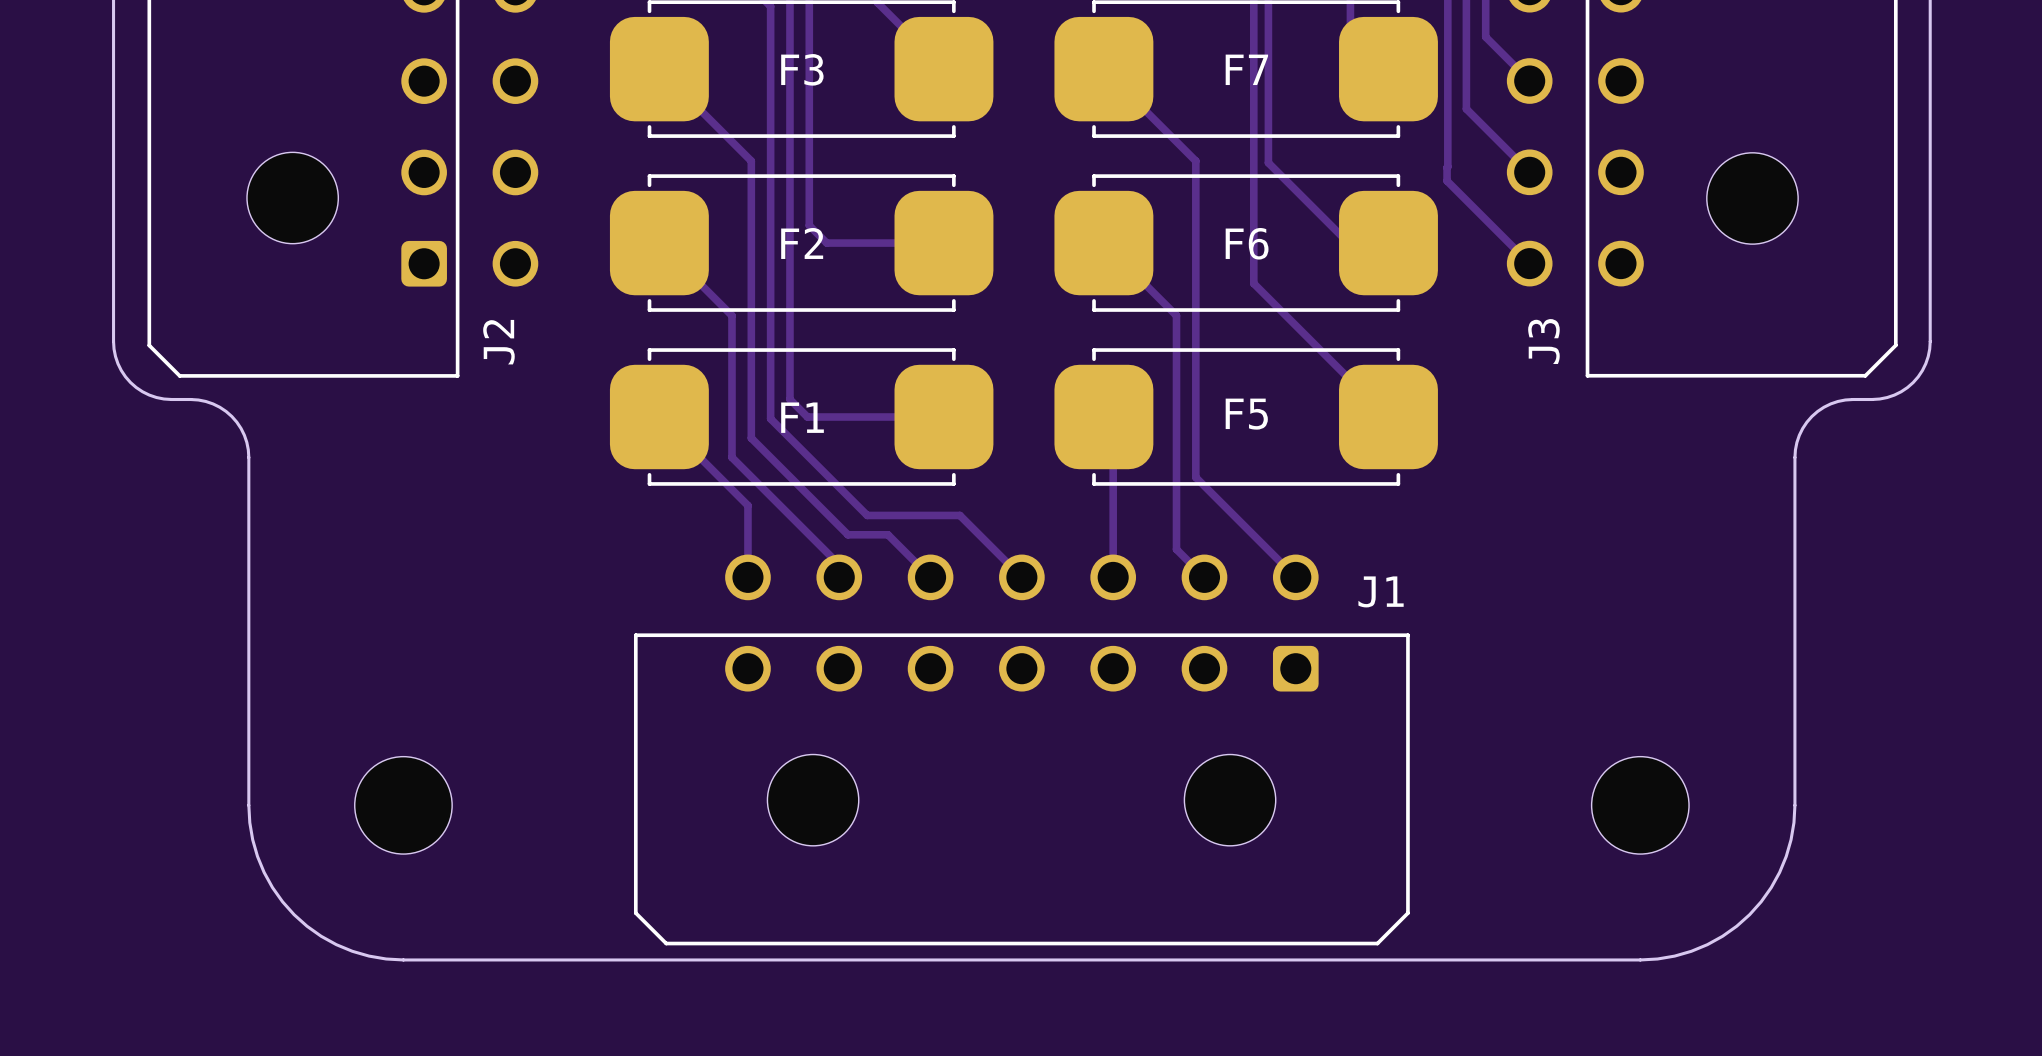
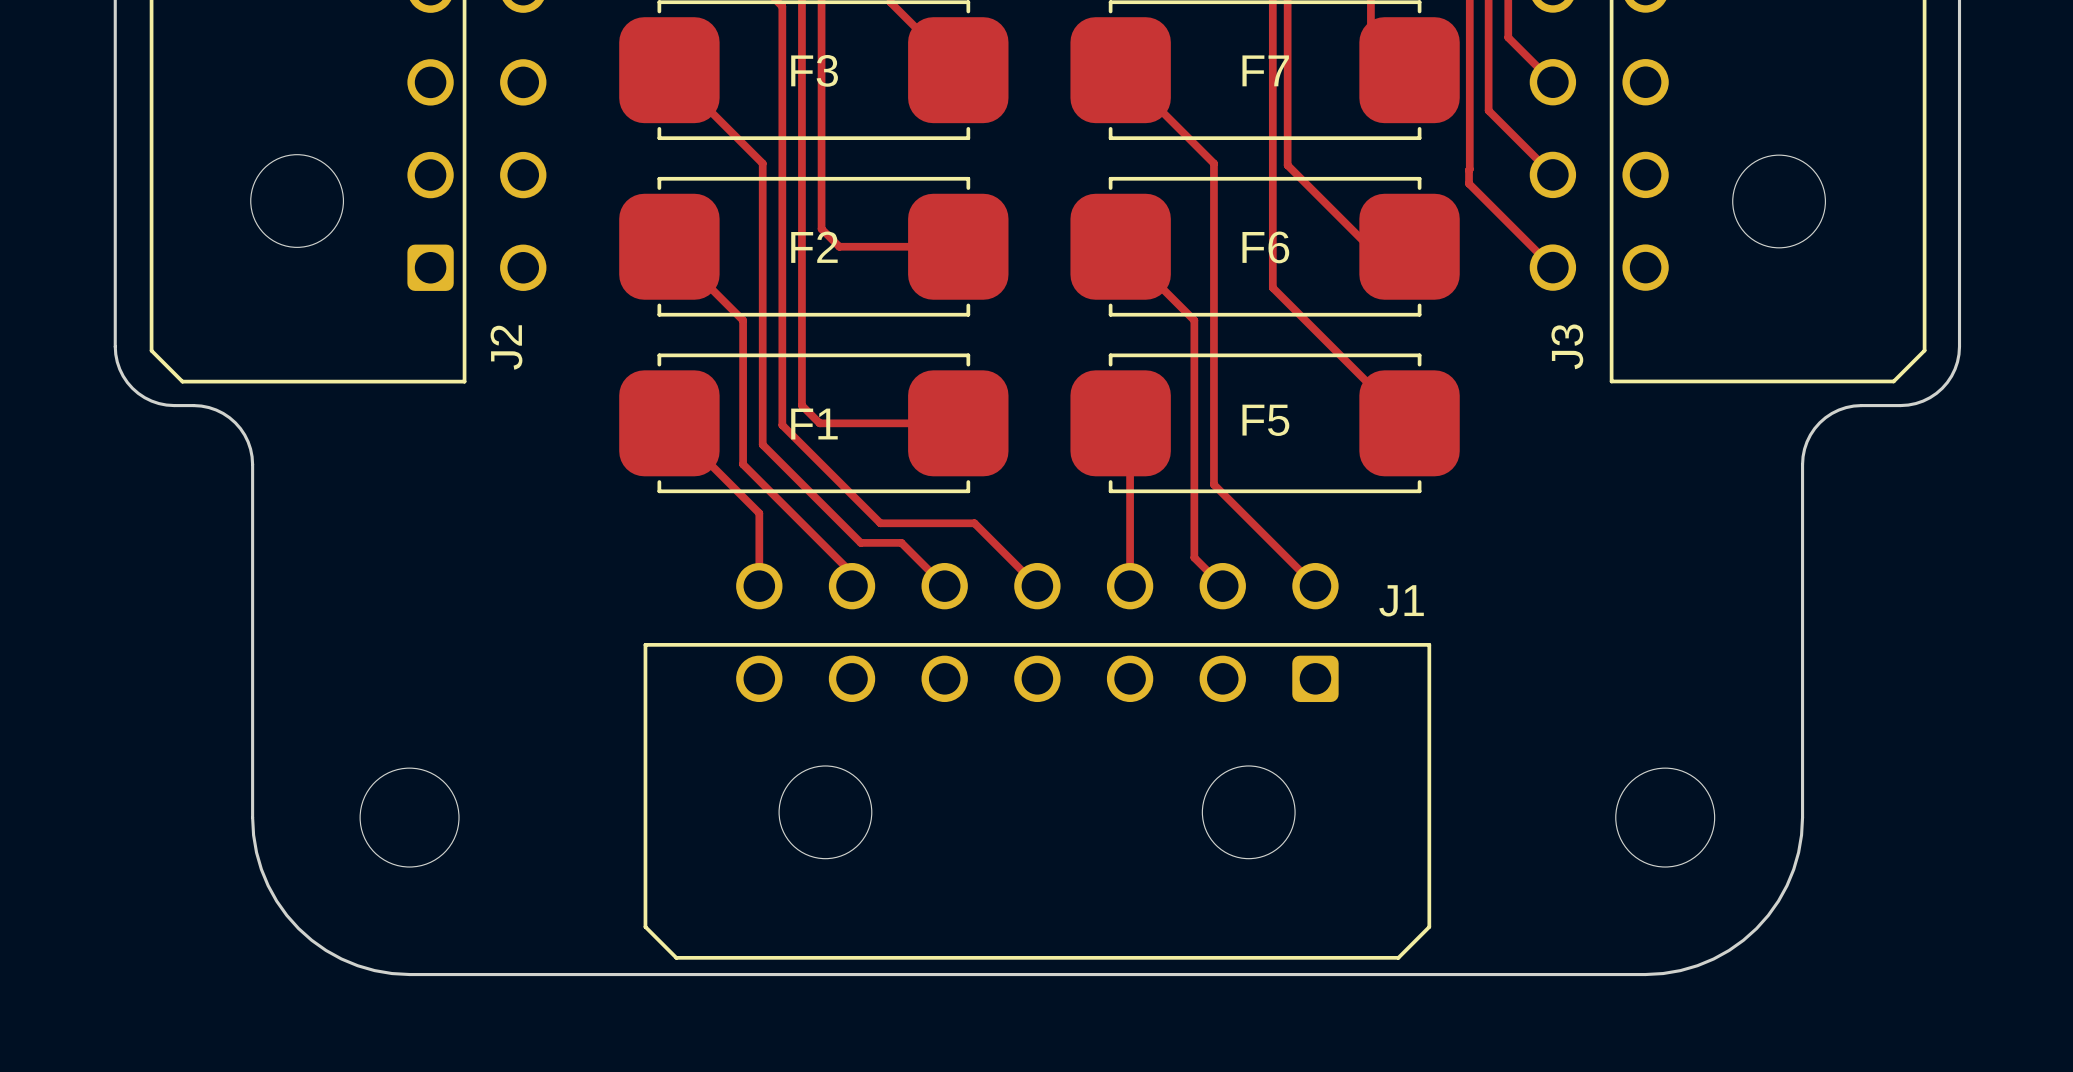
board edge: (1852, 399) (1830, 403) (1811, 416) (1802, 428) (1795, 449) (1794, 805) (1793, 822) (1786, 856) (1771, 887) (1761, 901) (1736, 926) (1722, 936) (1691, 951) (1674, 956) (1657, 958) (1621, 959) -> (1881, 405) (1853, 406) (1831, 413) (1819, 422) (1810, 434) (1803, 456) (1802, 817) (1798, 852) (1793, 869) (1787, 885) (1768, 915) (1756, 928) (1729, 950) (1697, 965) (1680, 970) (1645, 974)

